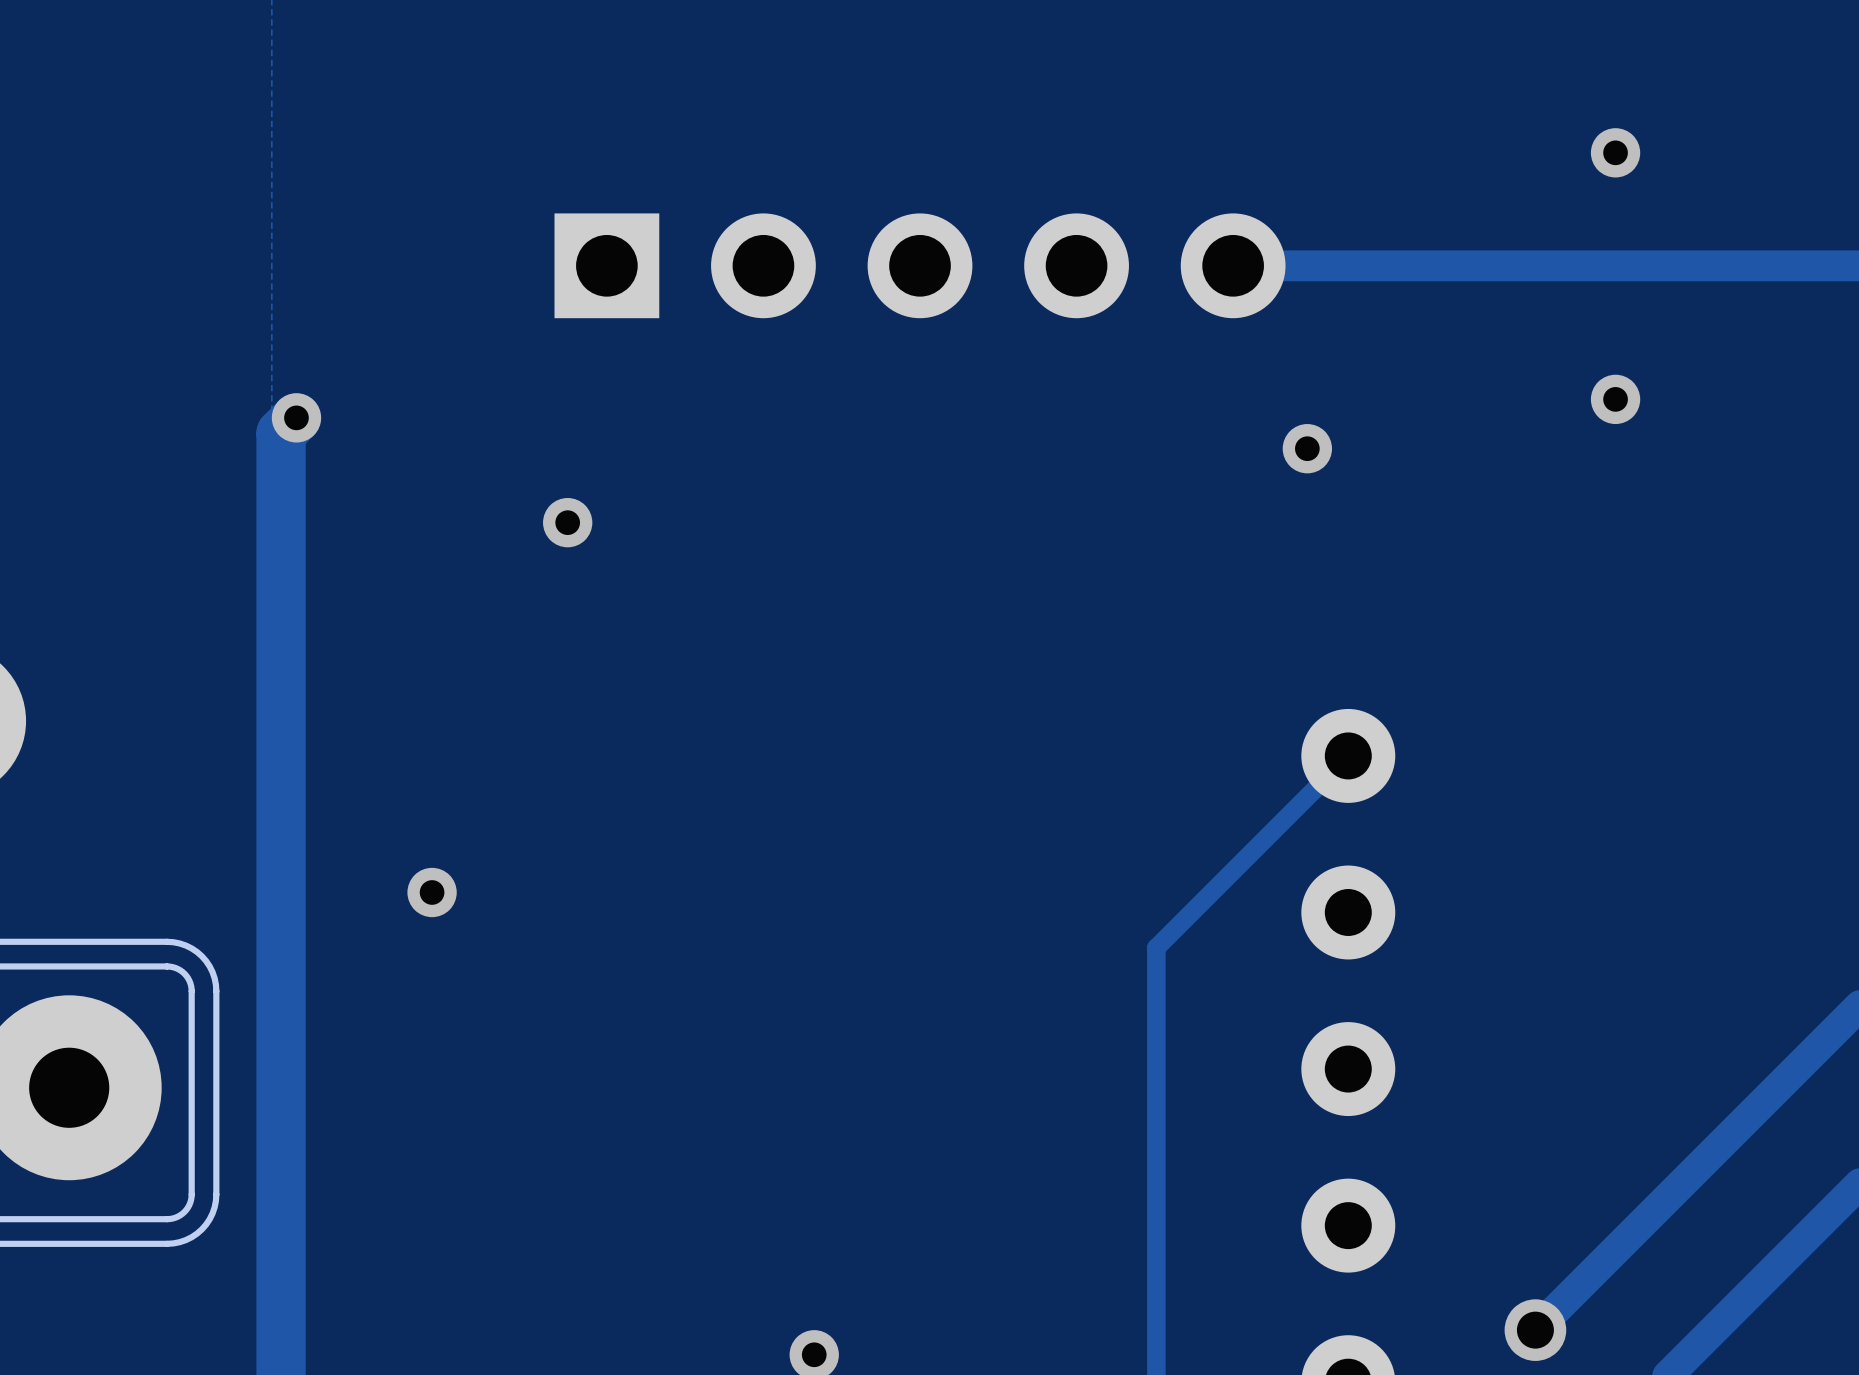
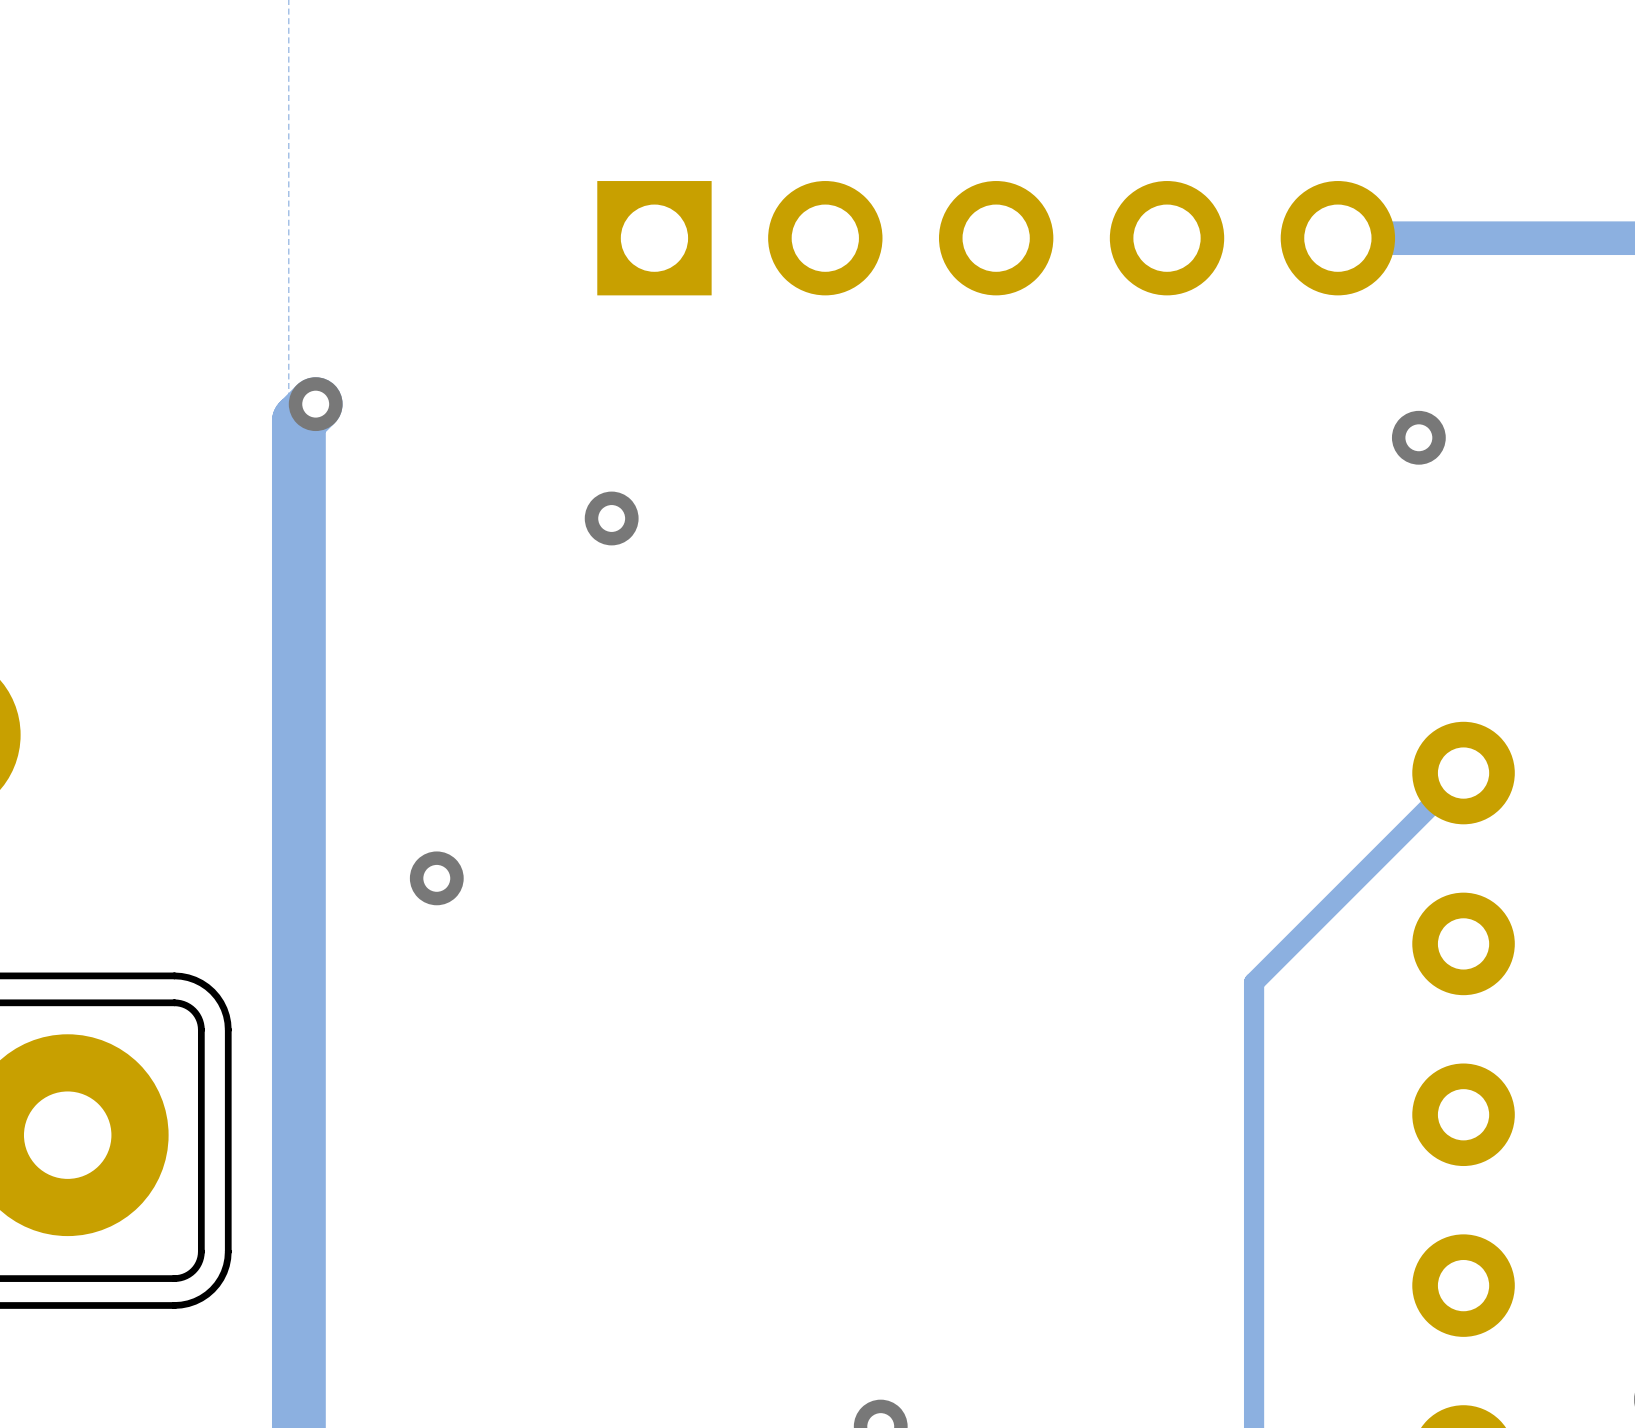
via position: (432, 892) -> (436, 878)

